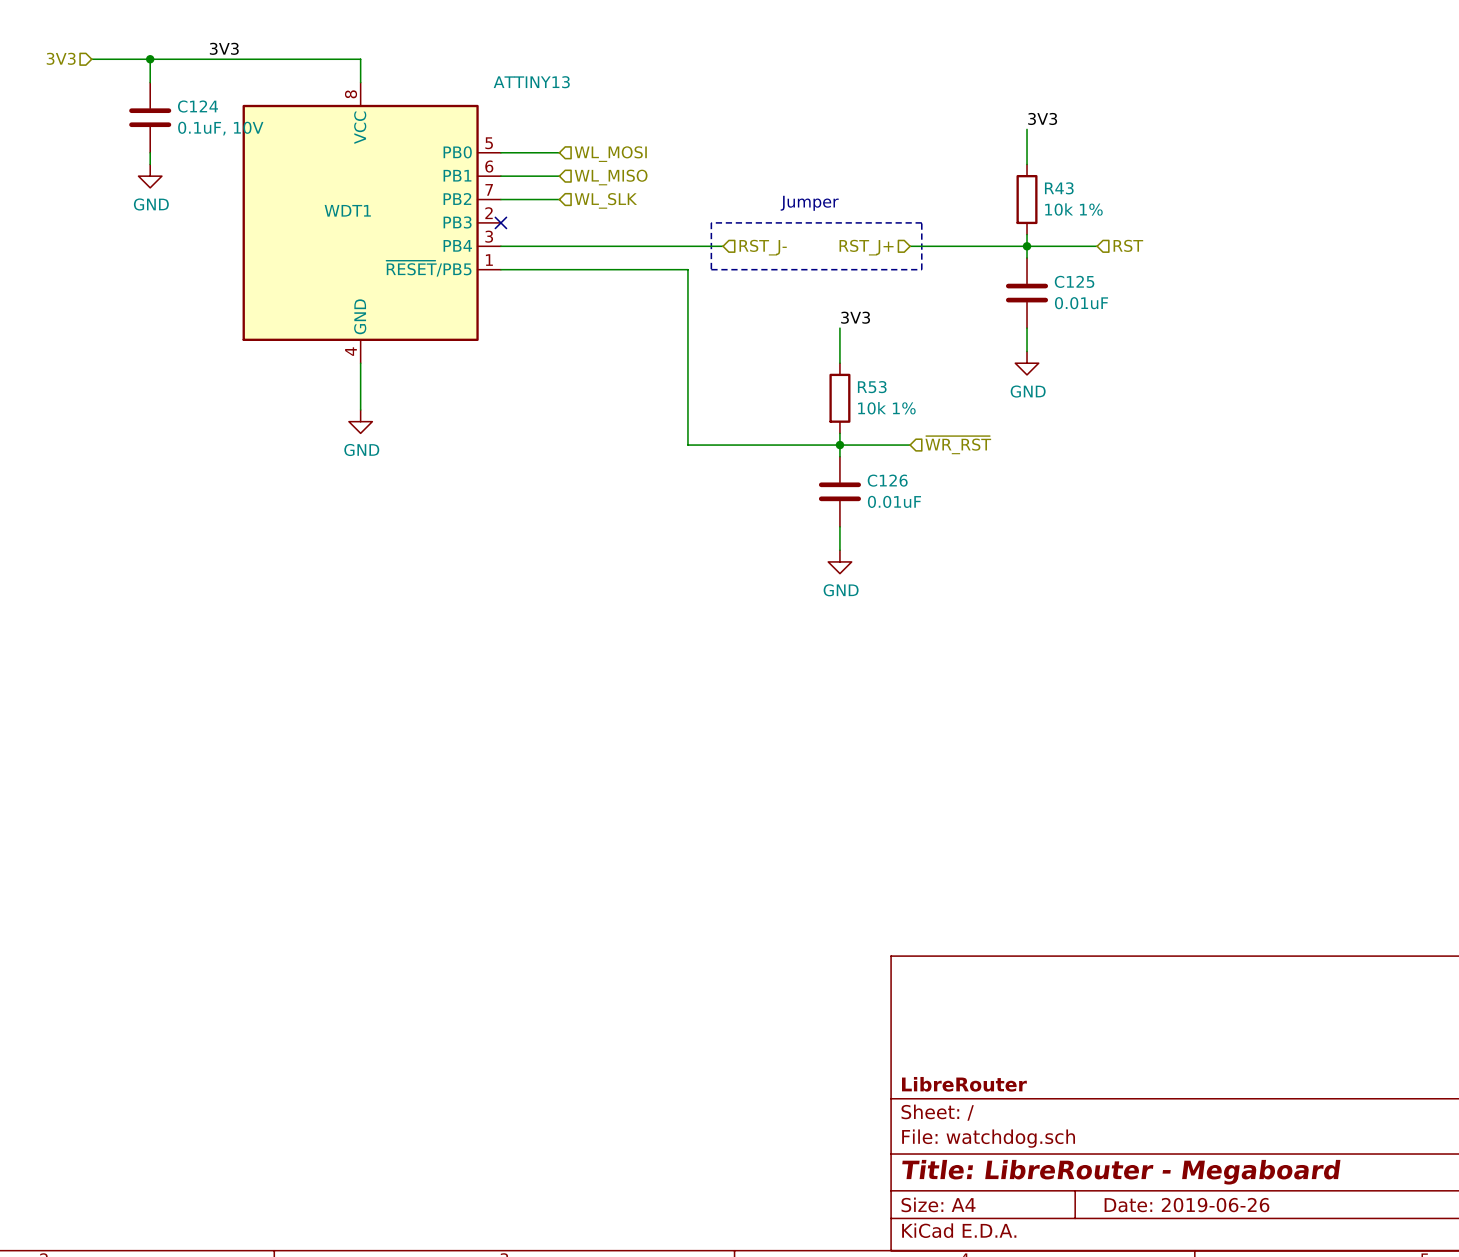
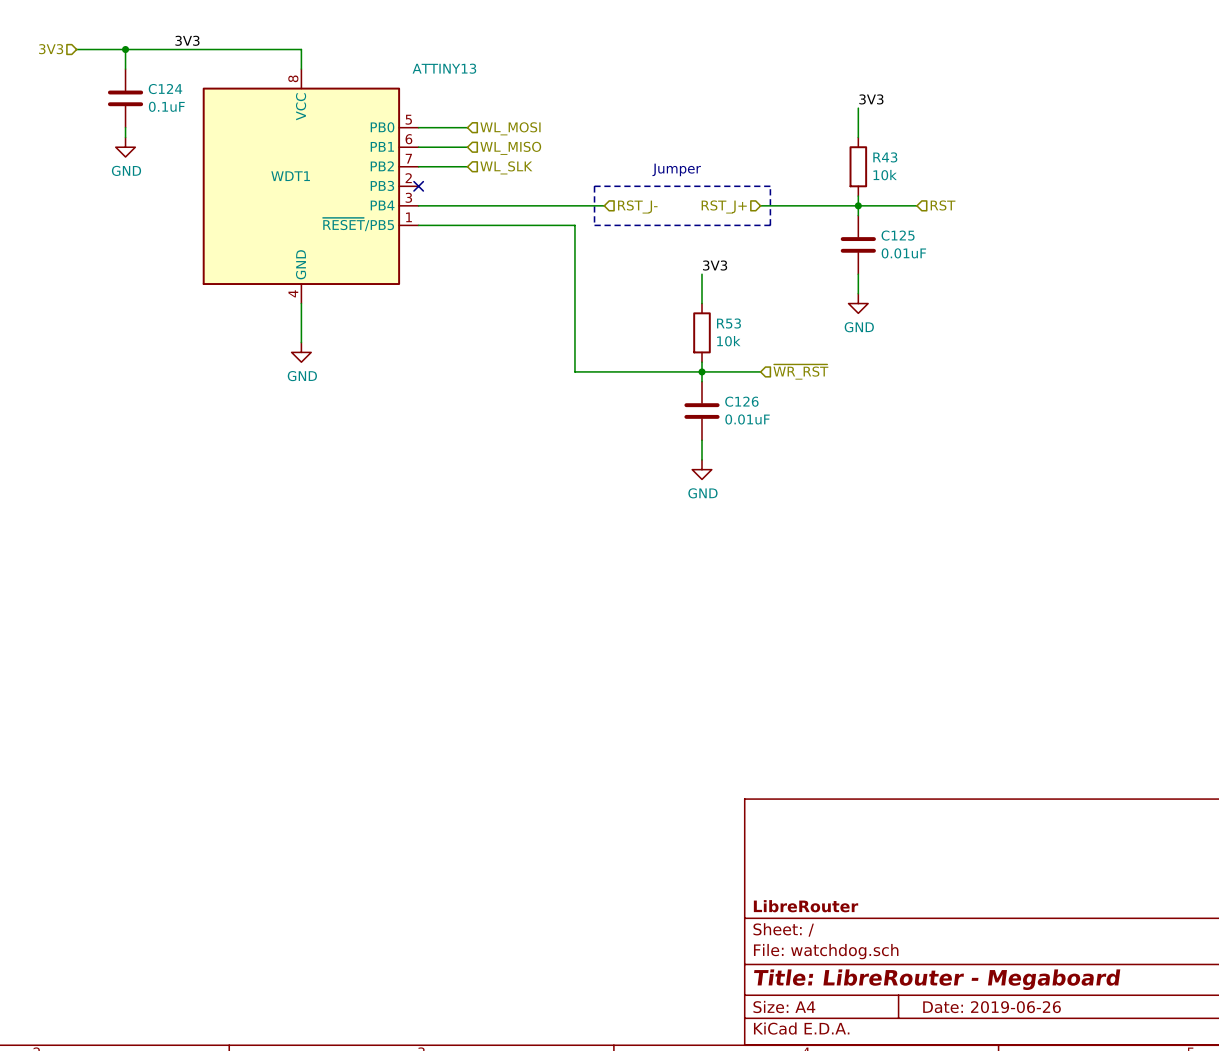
C124 value: 0.1uF, 10V (220, 128) -> 0.1uF (166, 106)
R43 value: 10k 1% (1073, 209) -> 10k (885, 175)
R53 value: 10k 1% (886, 408) -> 10k (728, 341)

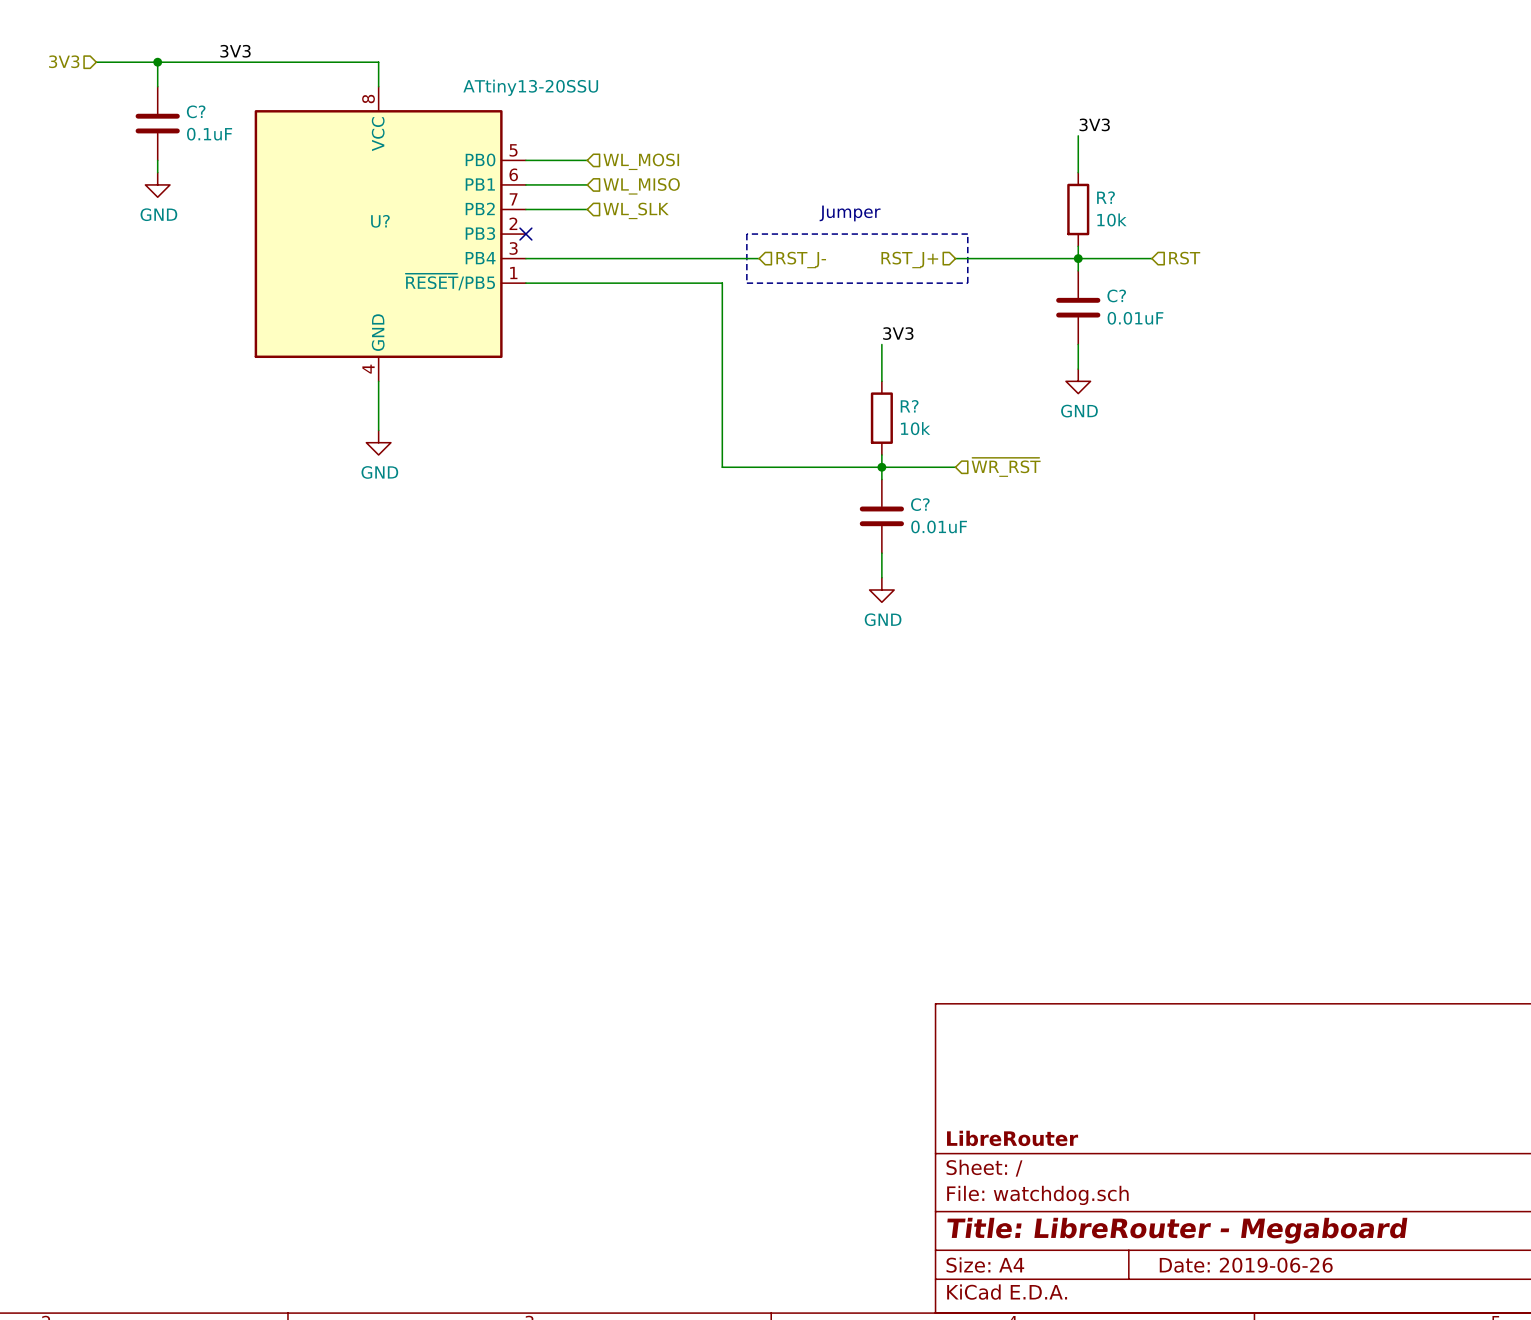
WDT1 value: ATTINY13 (444, 68) -> ATtiny13-20SSU (530, 87)
C124 name: C124 (165, 89) -> C? (196, 111)
R43 name: R43 (885, 157) -> R? (1106, 197)
WDT1 name: WDT1 (290, 176) -> U? (380, 221)
C125 name: C125 (898, 235) -> C? (1116, 295)
R53 name: R53 (728, 323) -> R? (909, 406)
C126 name: C126 (741, 401) -> C? (920, 504)

